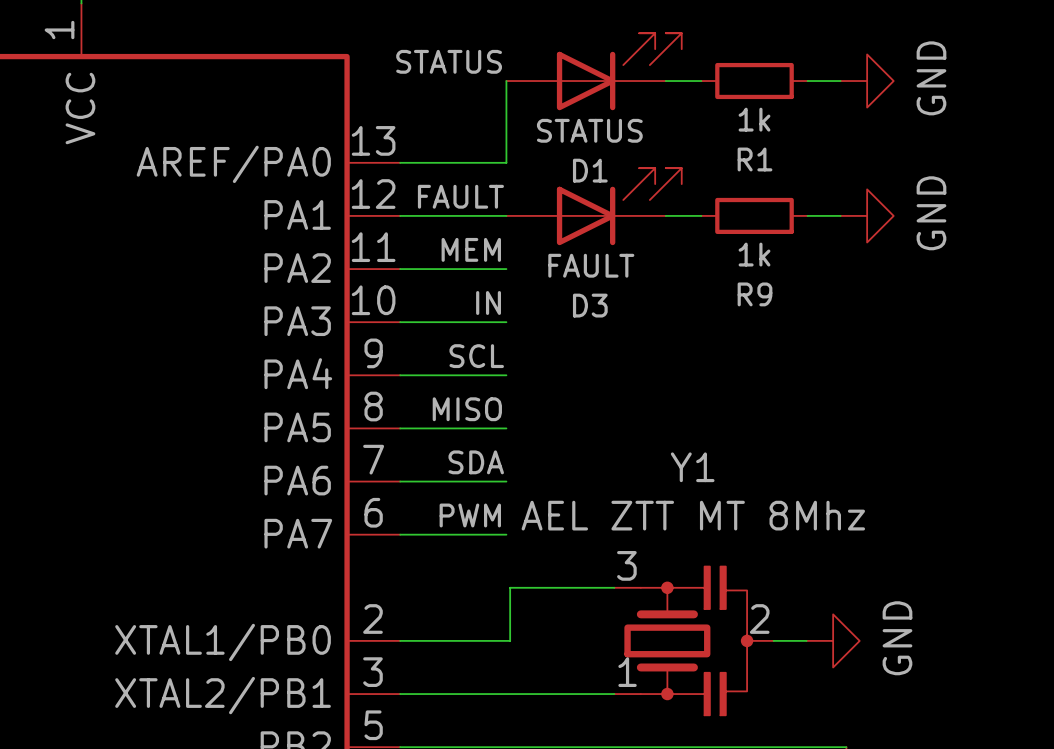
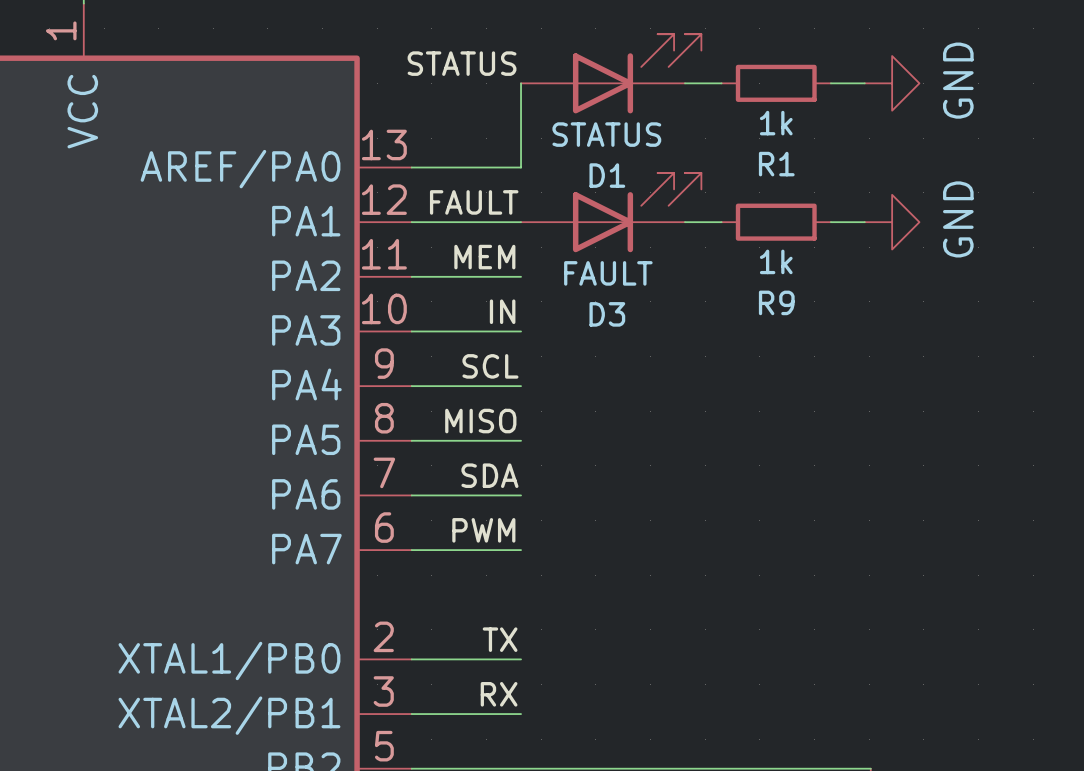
wire: (614, 587) (510, 587) (510, 640) (506, 640) -> none
label: none -> TX (500, 639)
Y1: AEL ZTT MT 8Mhz (693, 640) -> none
wire: (773, 640) (806, 640) -> none
power symbol: GND (833, 640) -> none
label: none -> RX (499, 694)
wire: (506, 694) (614, 694) -> none

